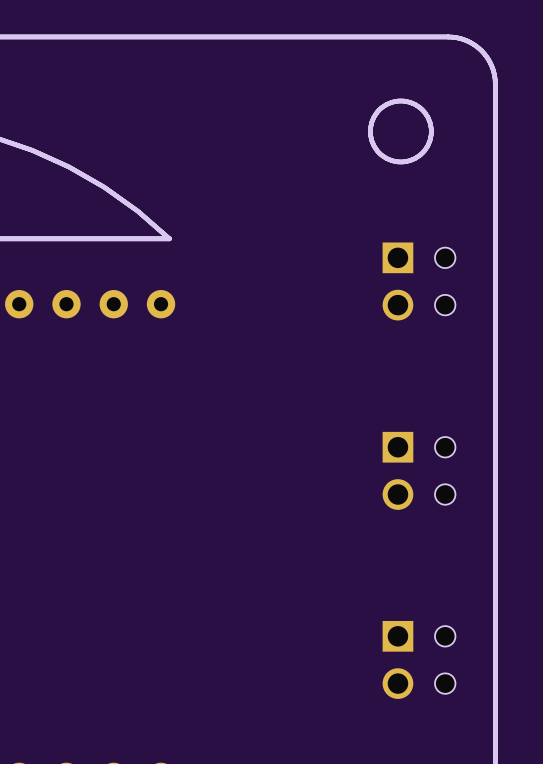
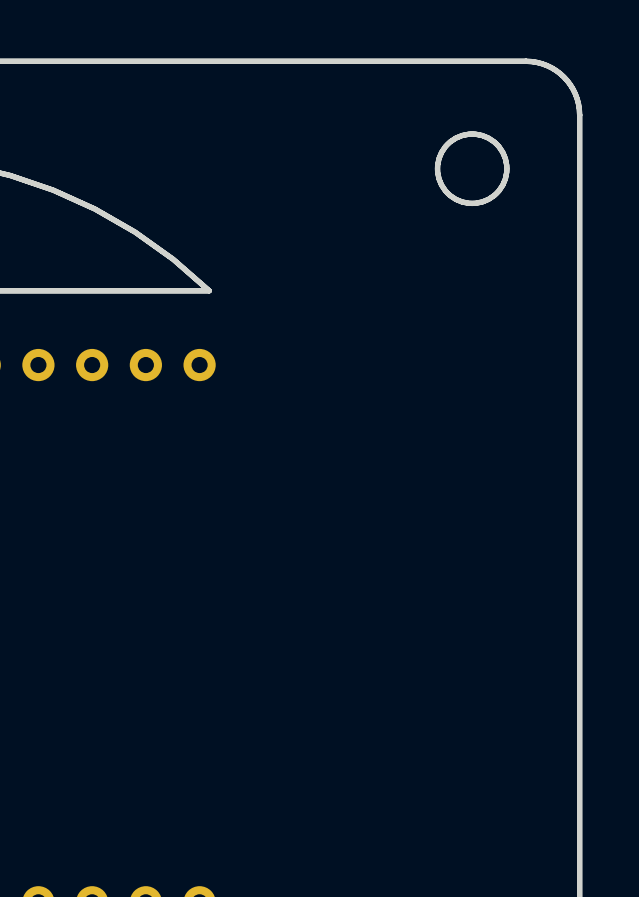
part: (419, 281) -> none
part: (419, 470) -> none
part: (419, 659) -> none

